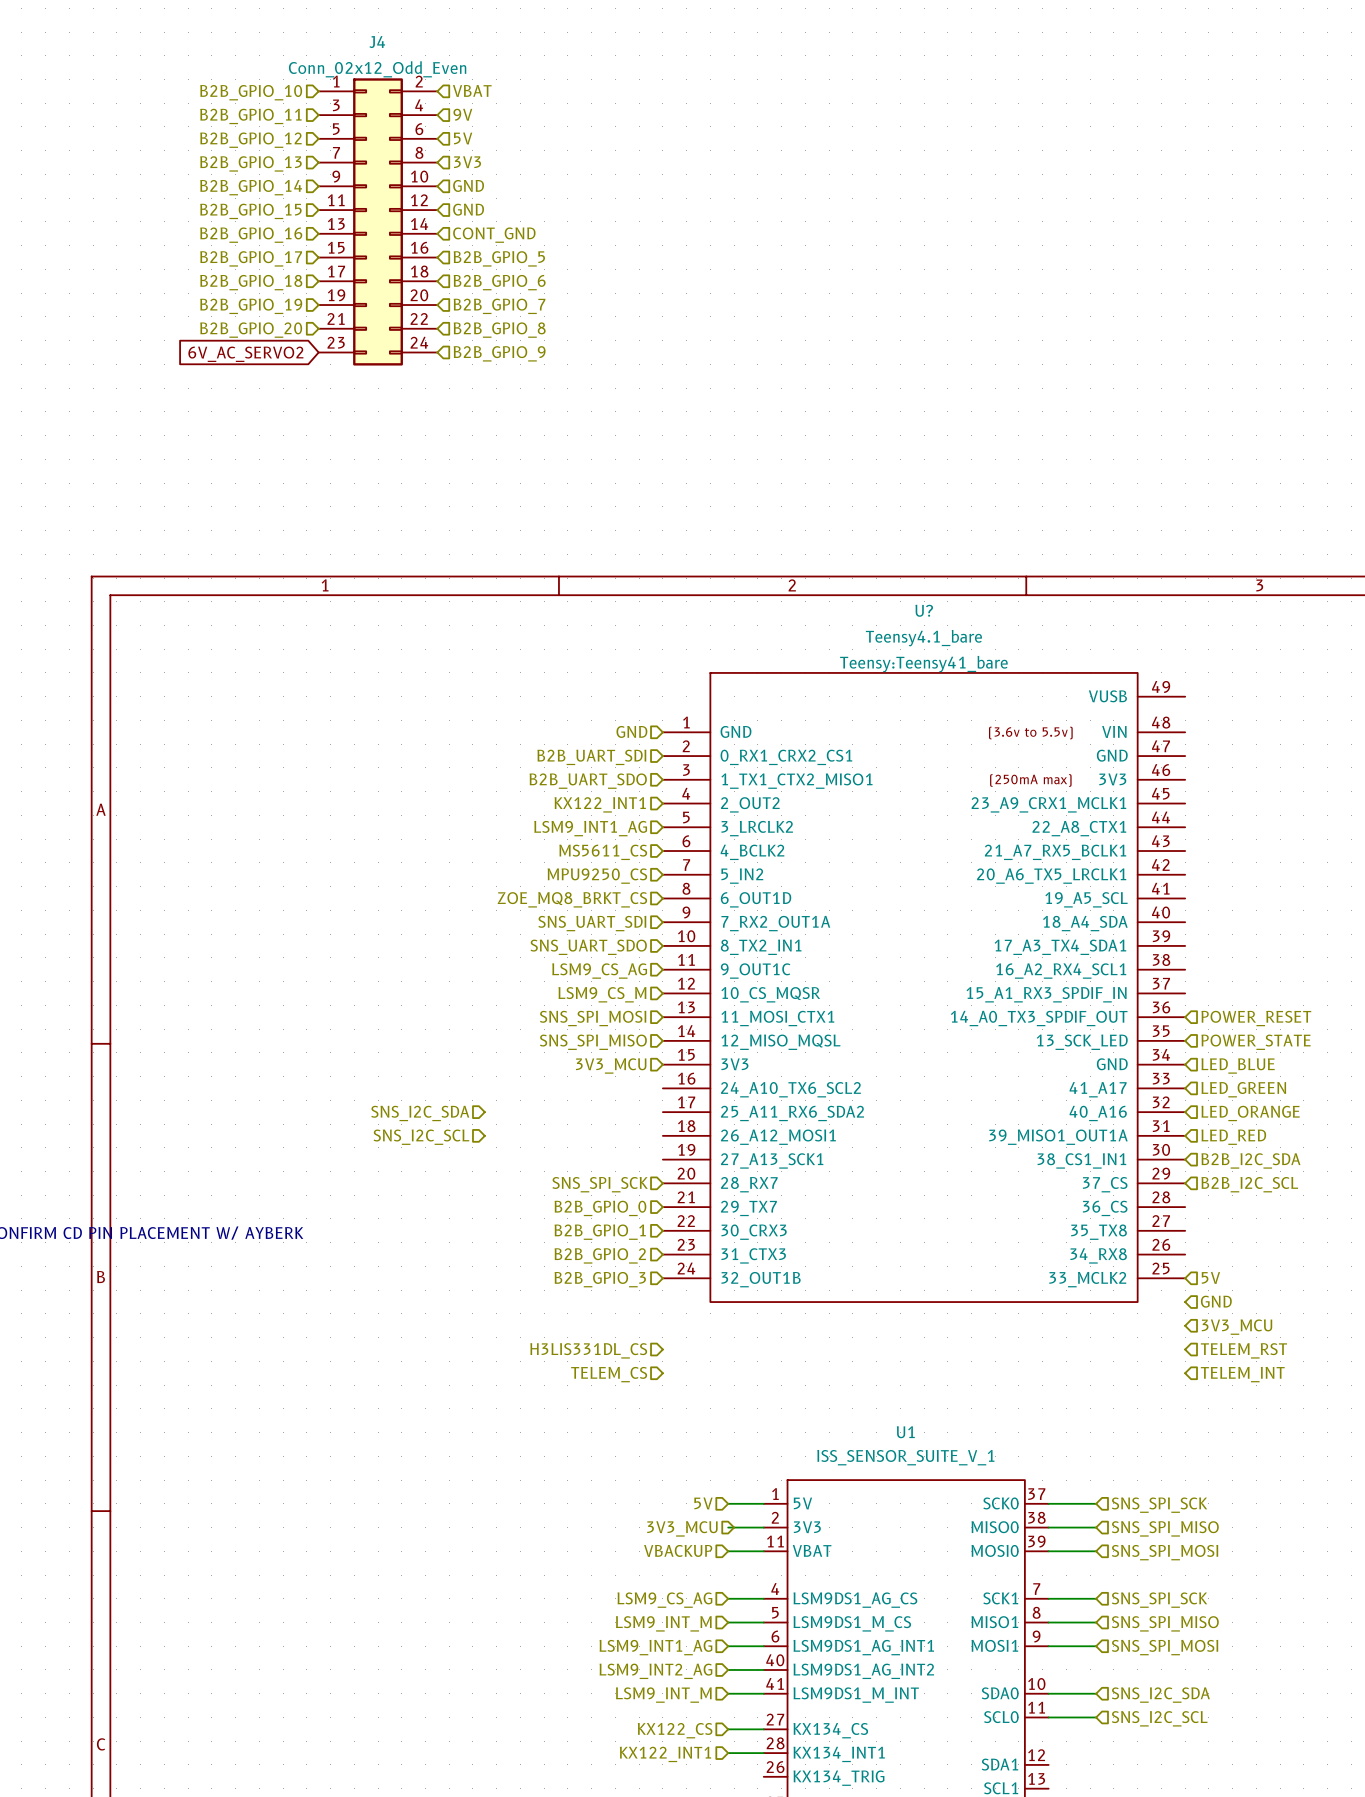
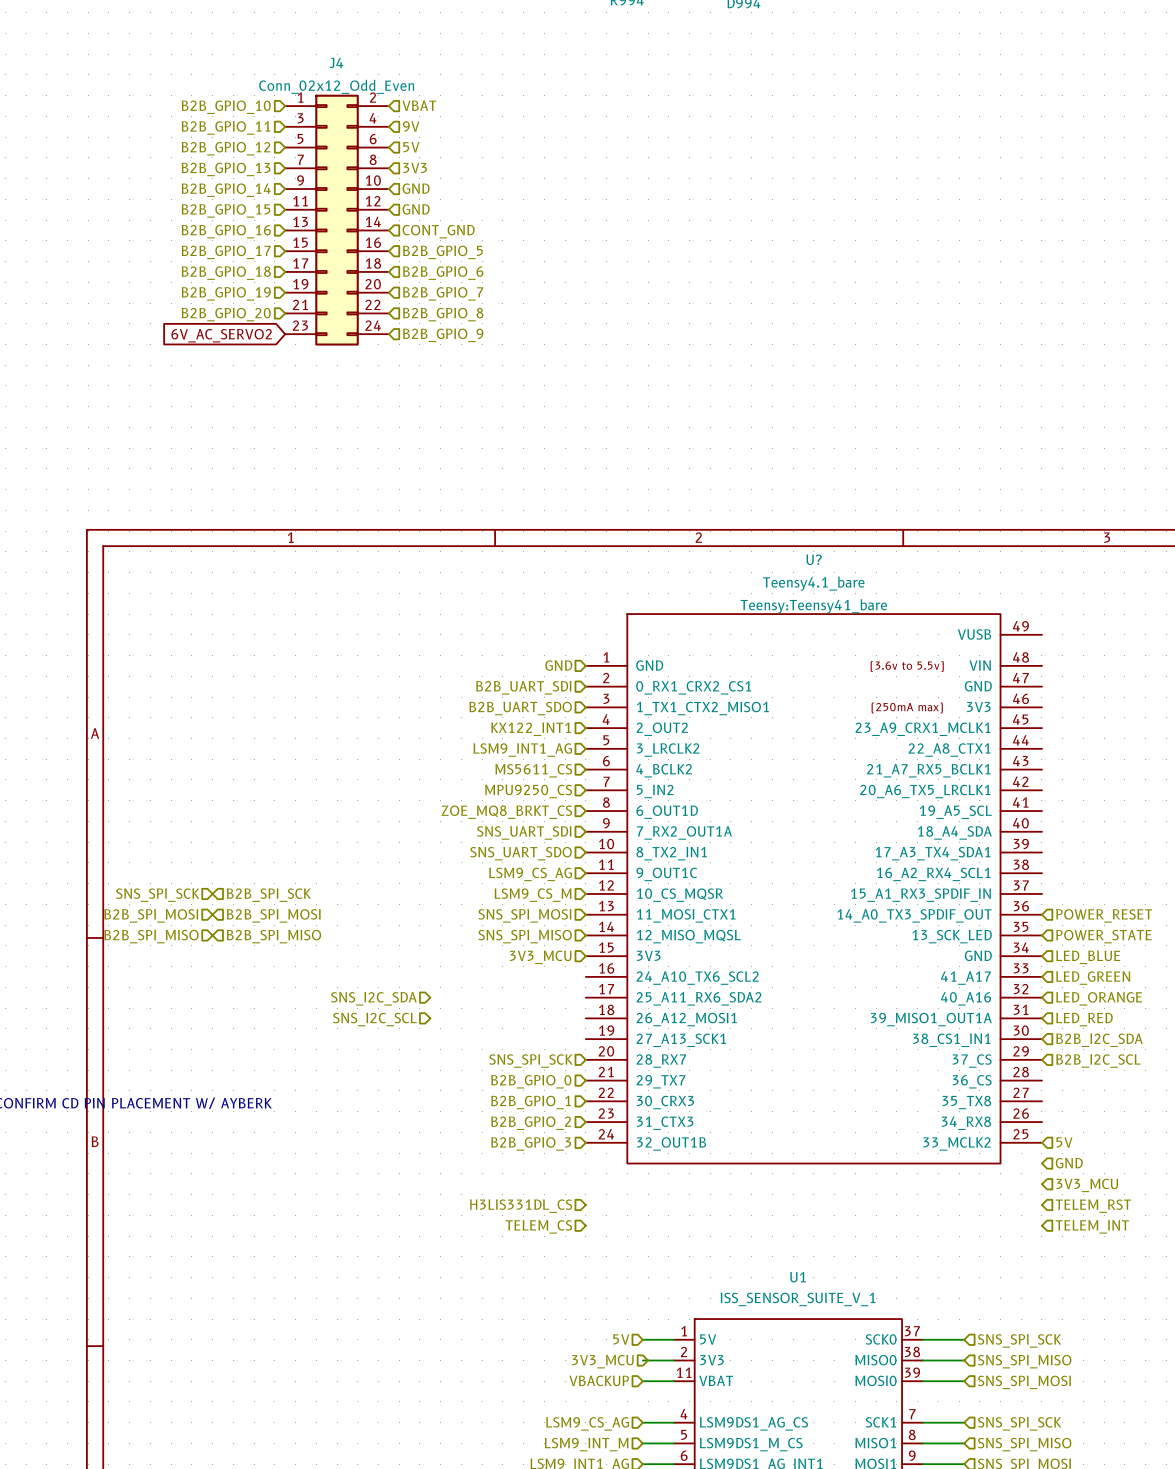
hierarchical label: none -> SNS_SPI_SCK (157, 895)
hierarchical label: none -> B2B_SPI_SCK (268, 895)
hierarchical label: none -> B2B_SPI_MOSI (151, 915)
hierarchical label: none -> B2B_SPI_MOSI (273, 915)
hierarchical label: none -> B2B_SPI_MISO (151, 936)
hierarchical label: none -> B2B_SPI_MISO (273, 936)

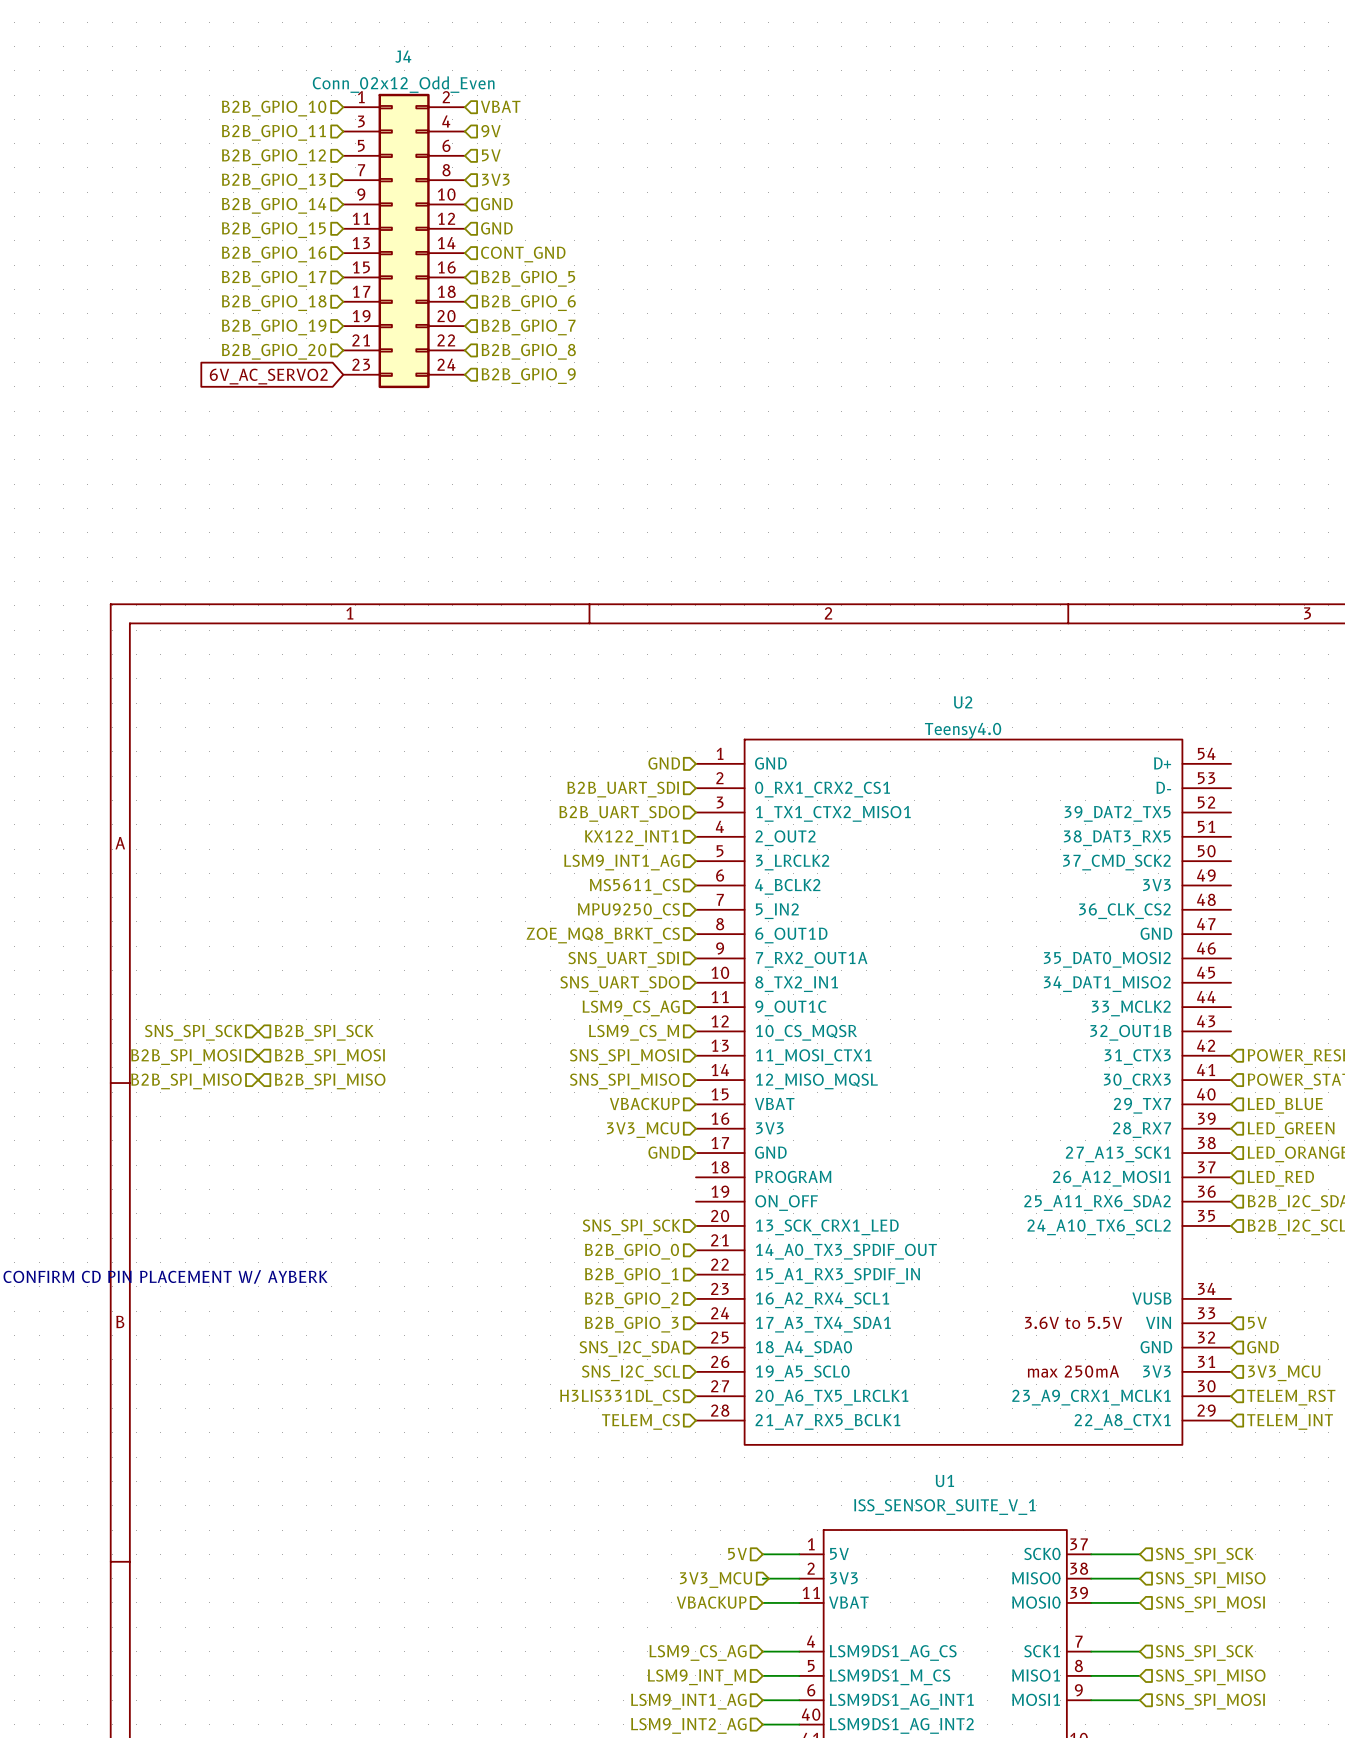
U?: Teensy4.1_bare (813, 888) -> none
U2: none -> Teensy4.0 (963, 1092)
hierarchical label: 3V3_MCU (540, 957) -> VBACKUP (644, 1104)
hierarchical label: none -> 3V3_MCU (643, 1130)
hierarchical label: none -> GND (664, 1152)
hierarchical label: SNS_I2C_SDA (373, 998) -> none
hierarchical label: SNS_I2C_SCL (374, 1019) -> none
hierarchical label: none -> SNS_I2C_SDA (629, 1348)
hierarchical label: none -> SNS_I2C_SCL (631, 1373)

